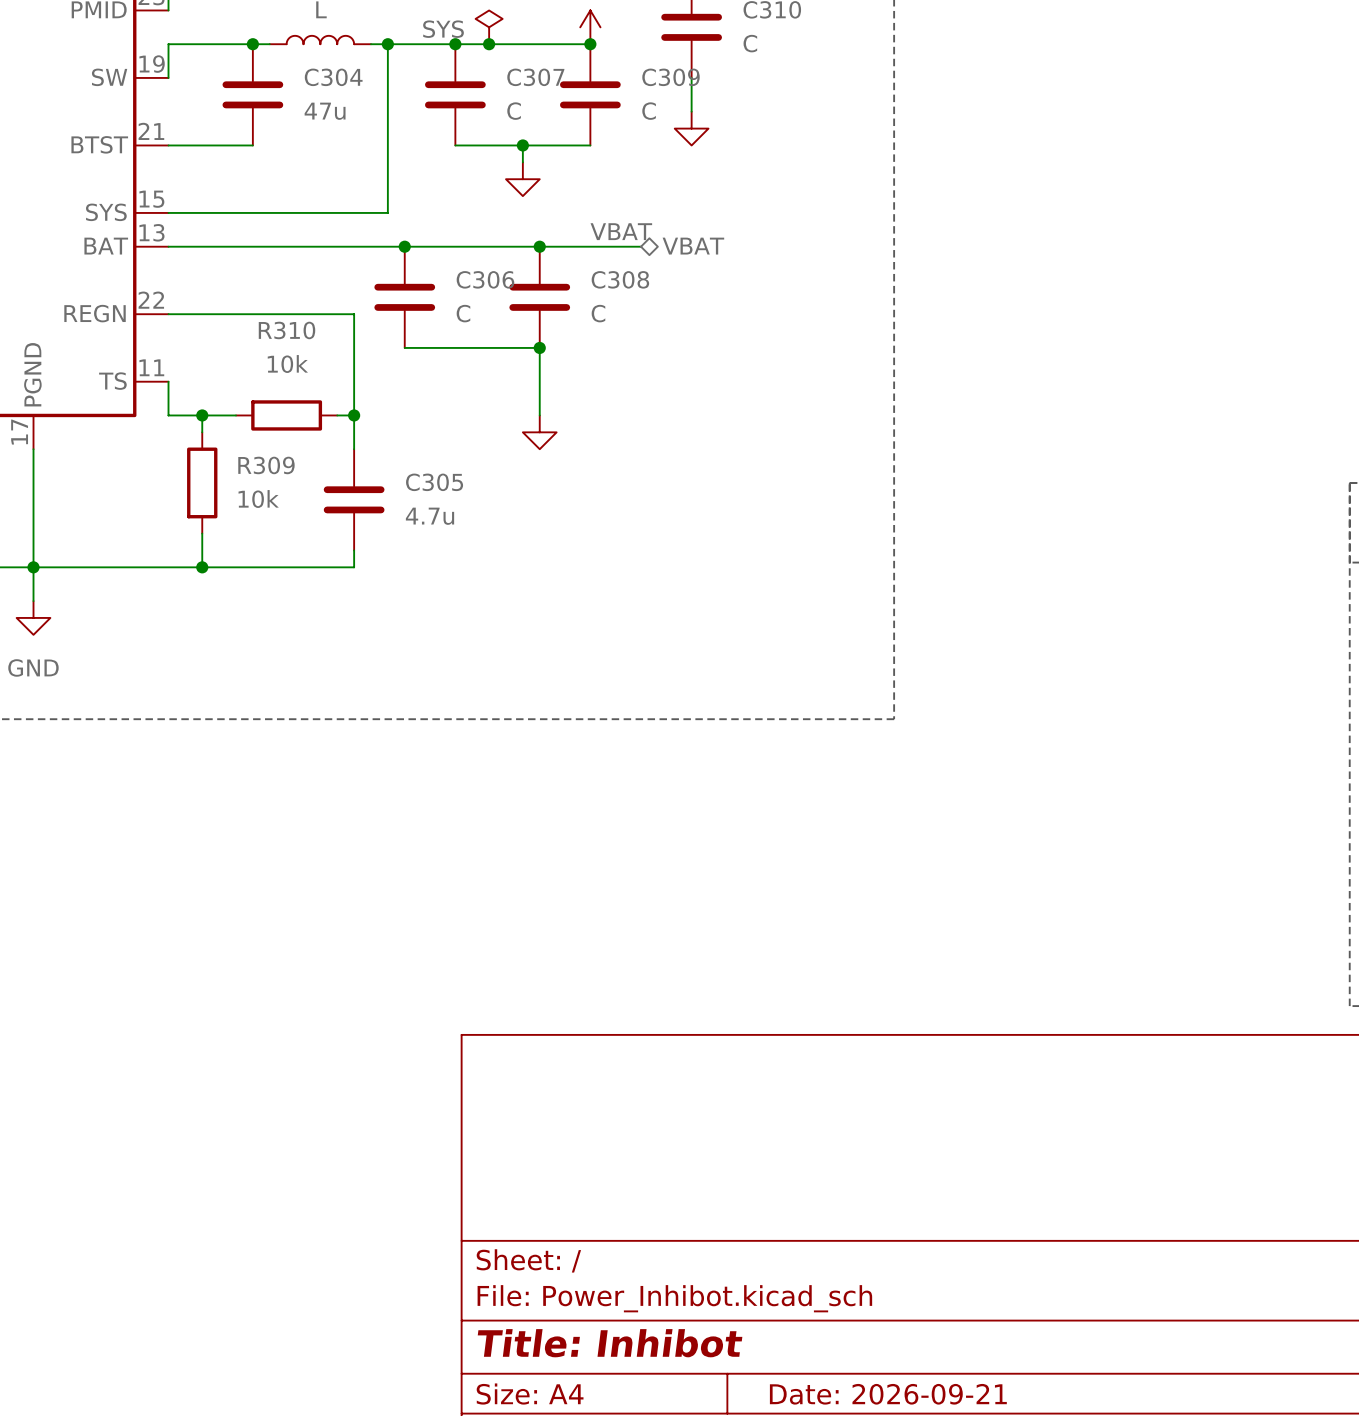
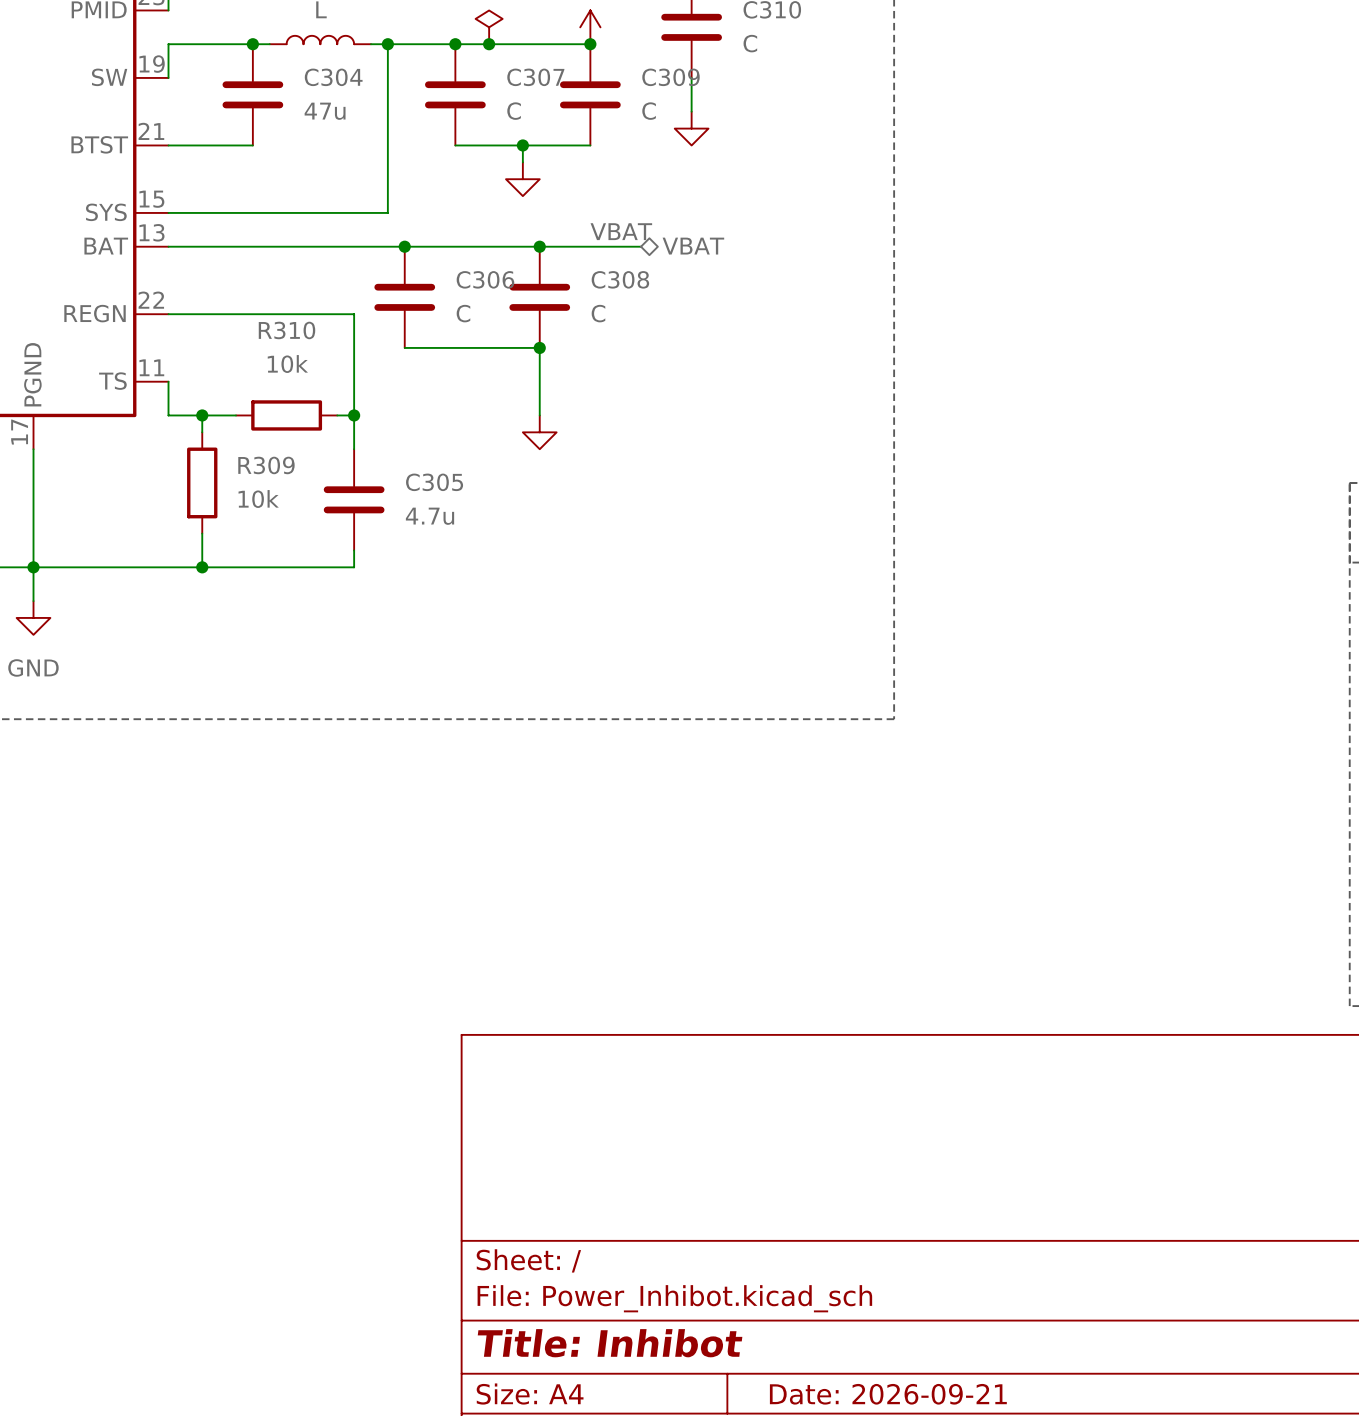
label: SYS (443, 29) -> none

